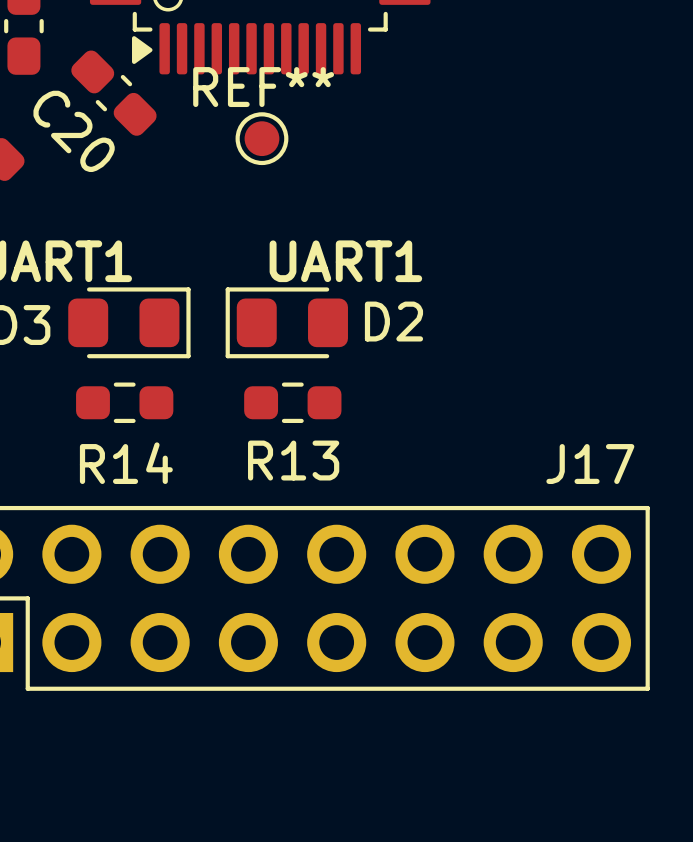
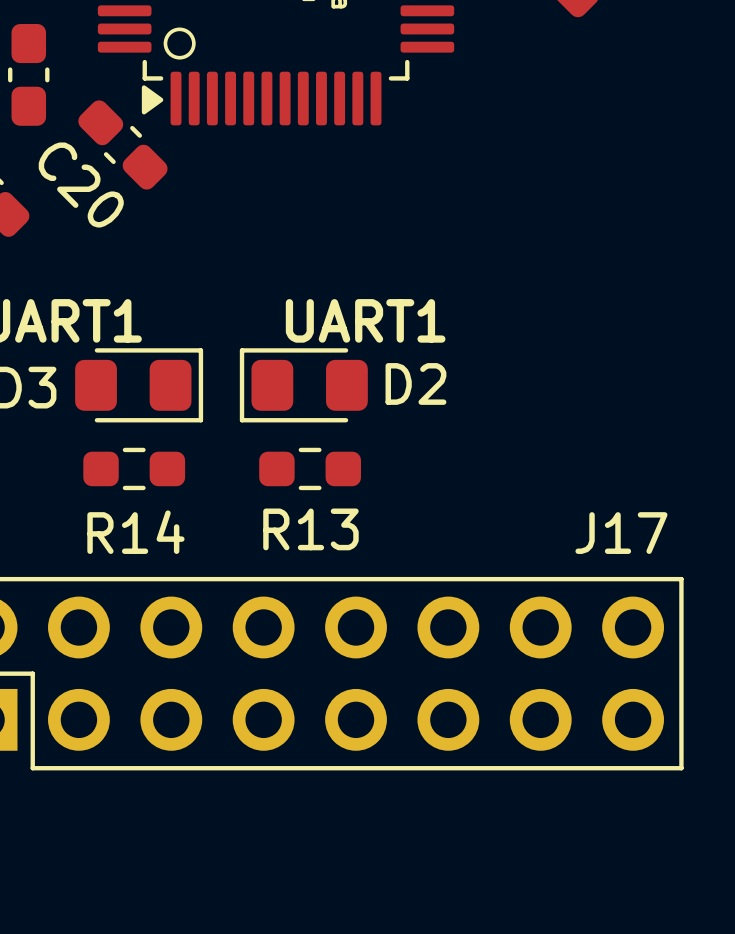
REF**: (261, 138) -> none

